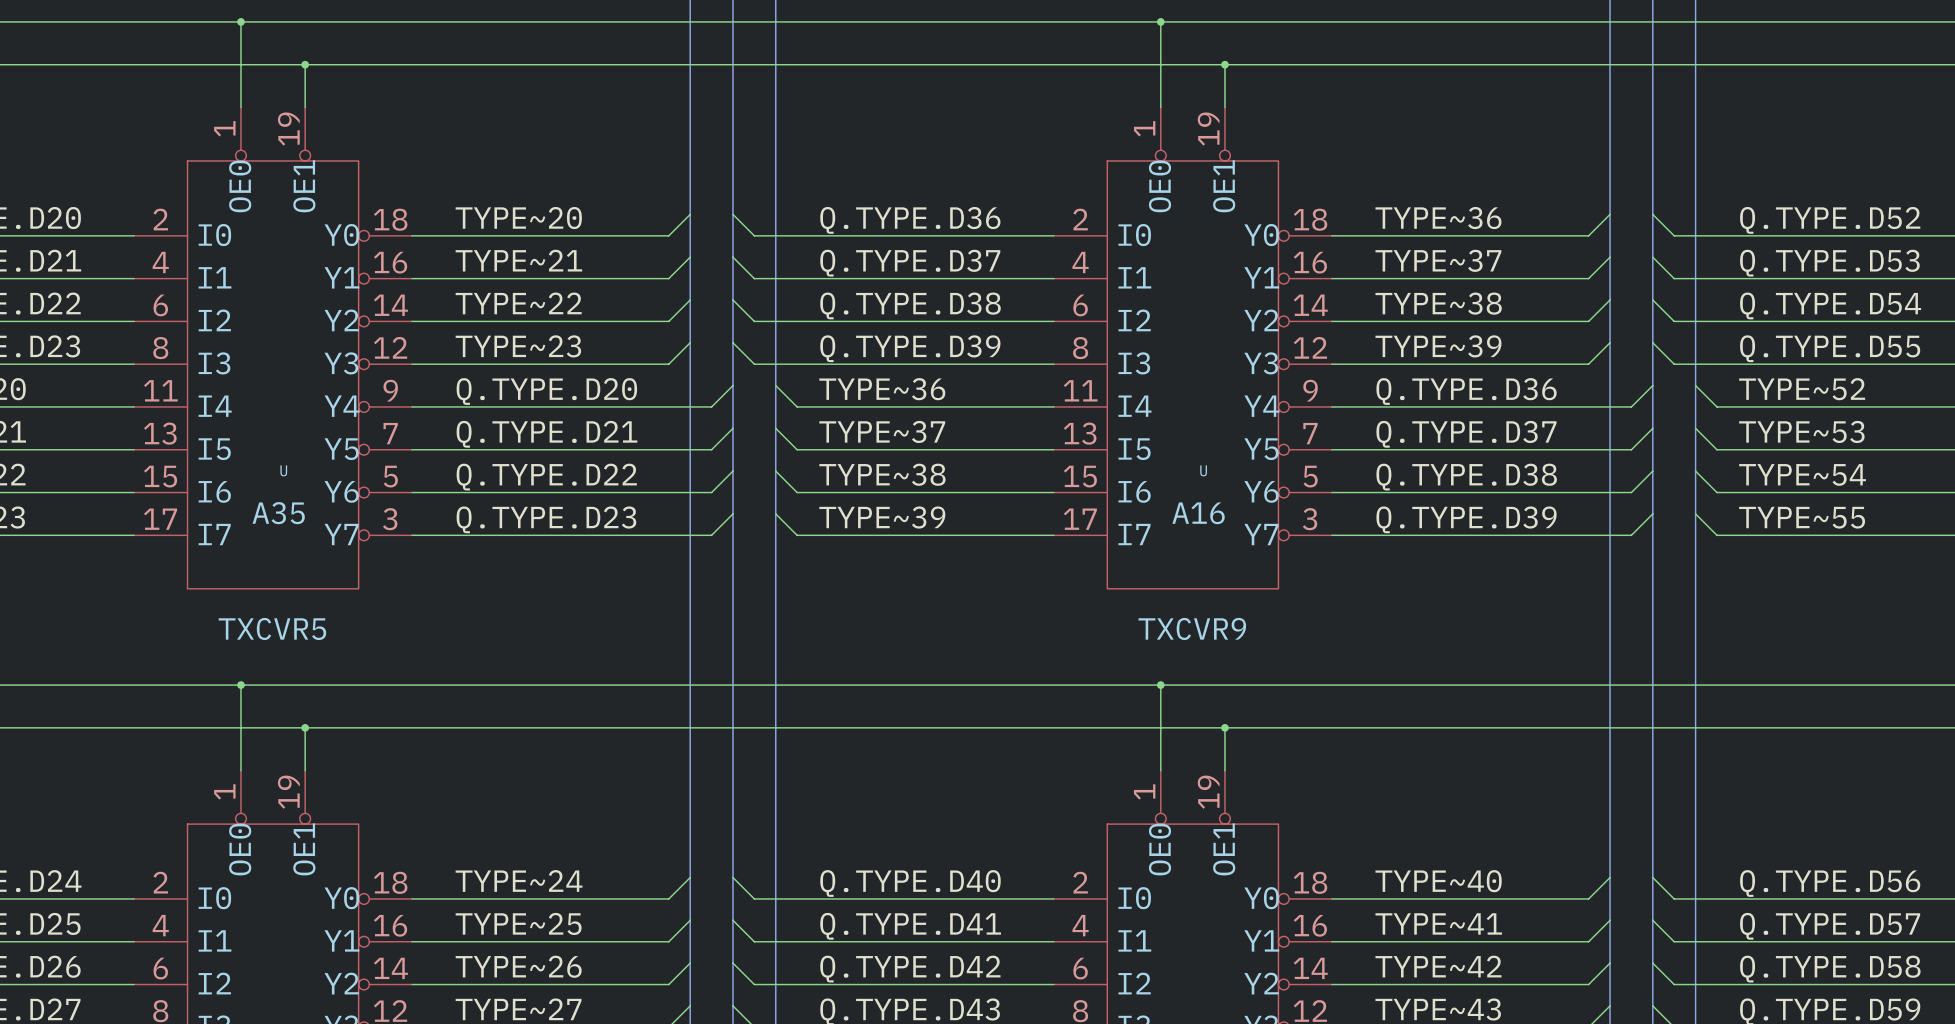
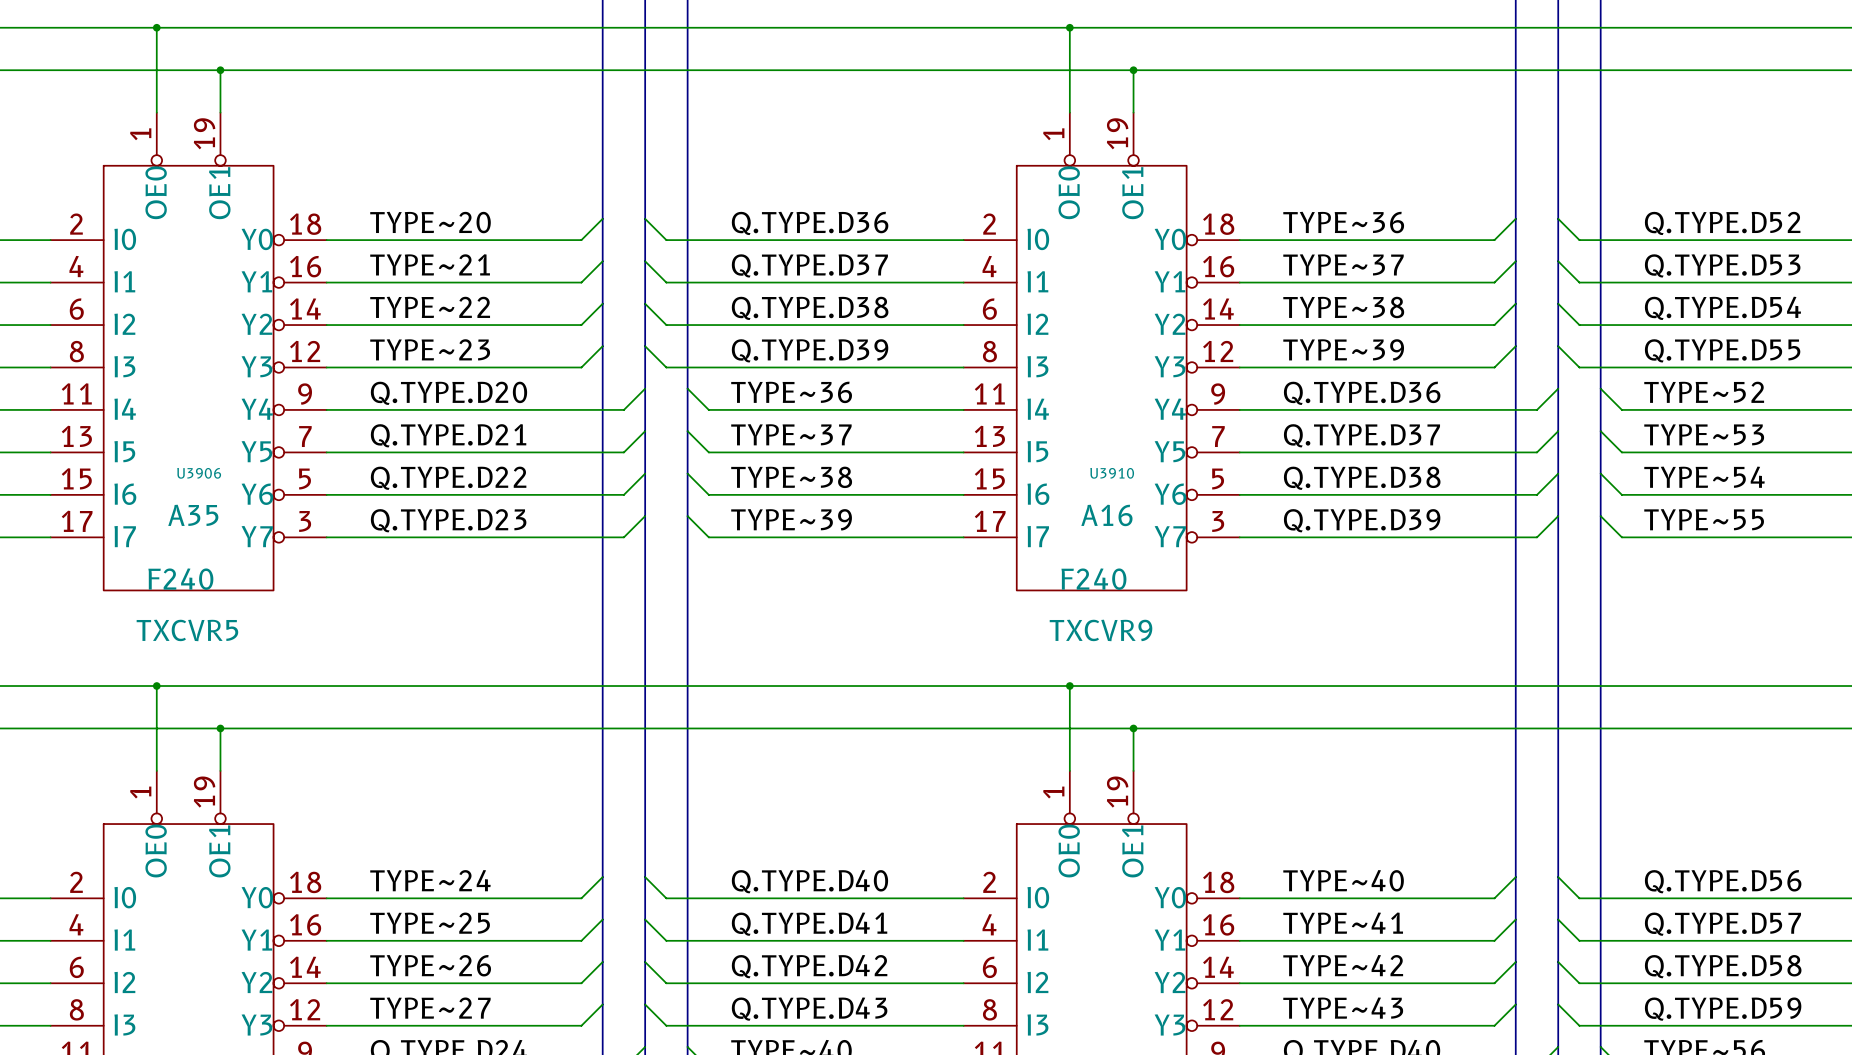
U name: U (283, 470) -> U3906 (199, 473)
U name: U (1203, 470) -> U3910 (1112, 473)
U value: none -> F240 (180, 579)
U value: none -> F240 (1093, 579)

